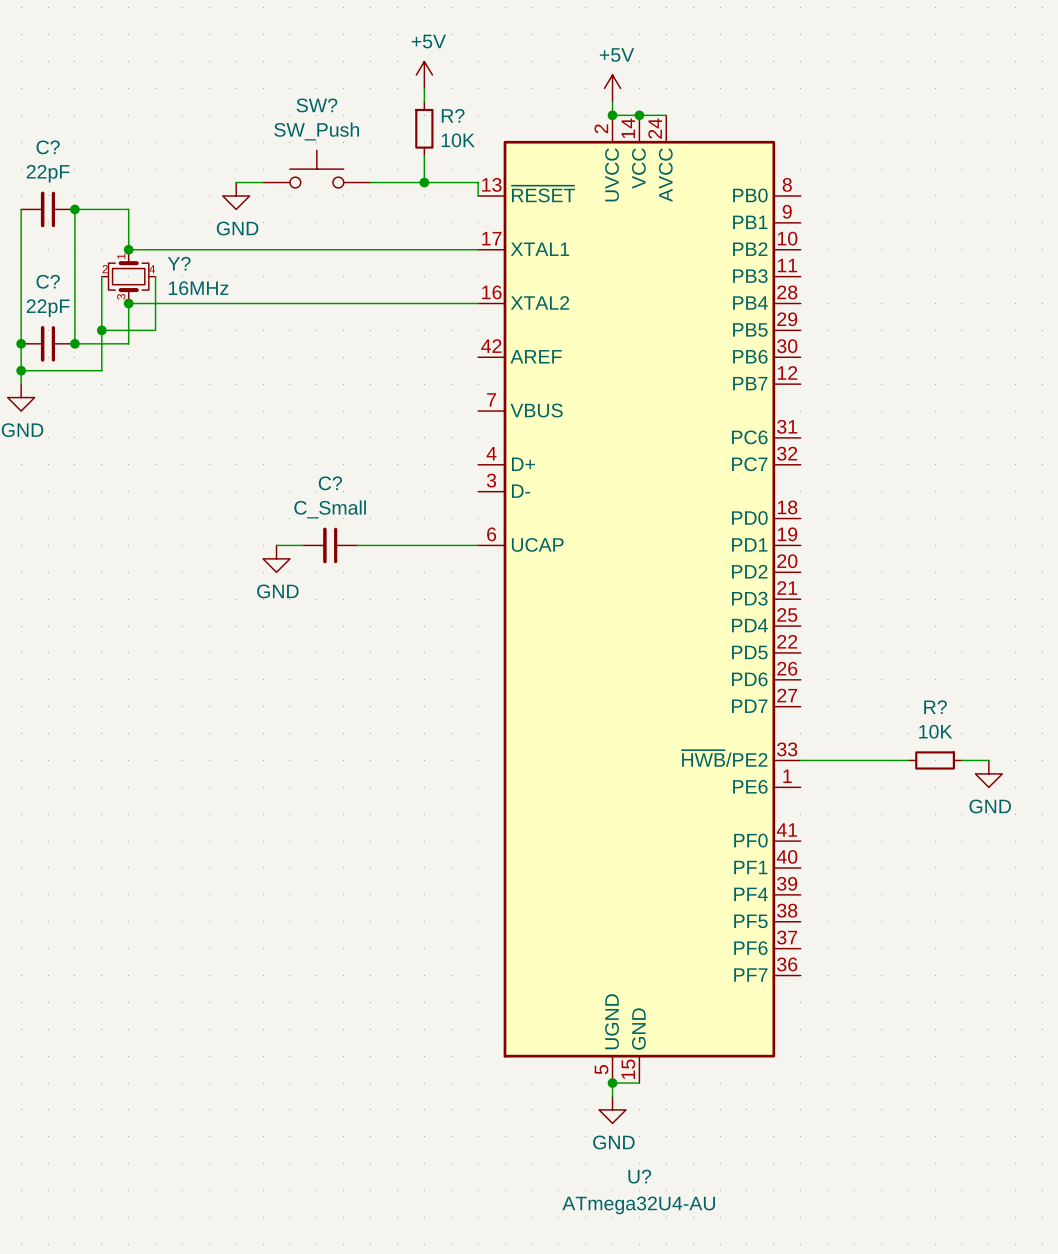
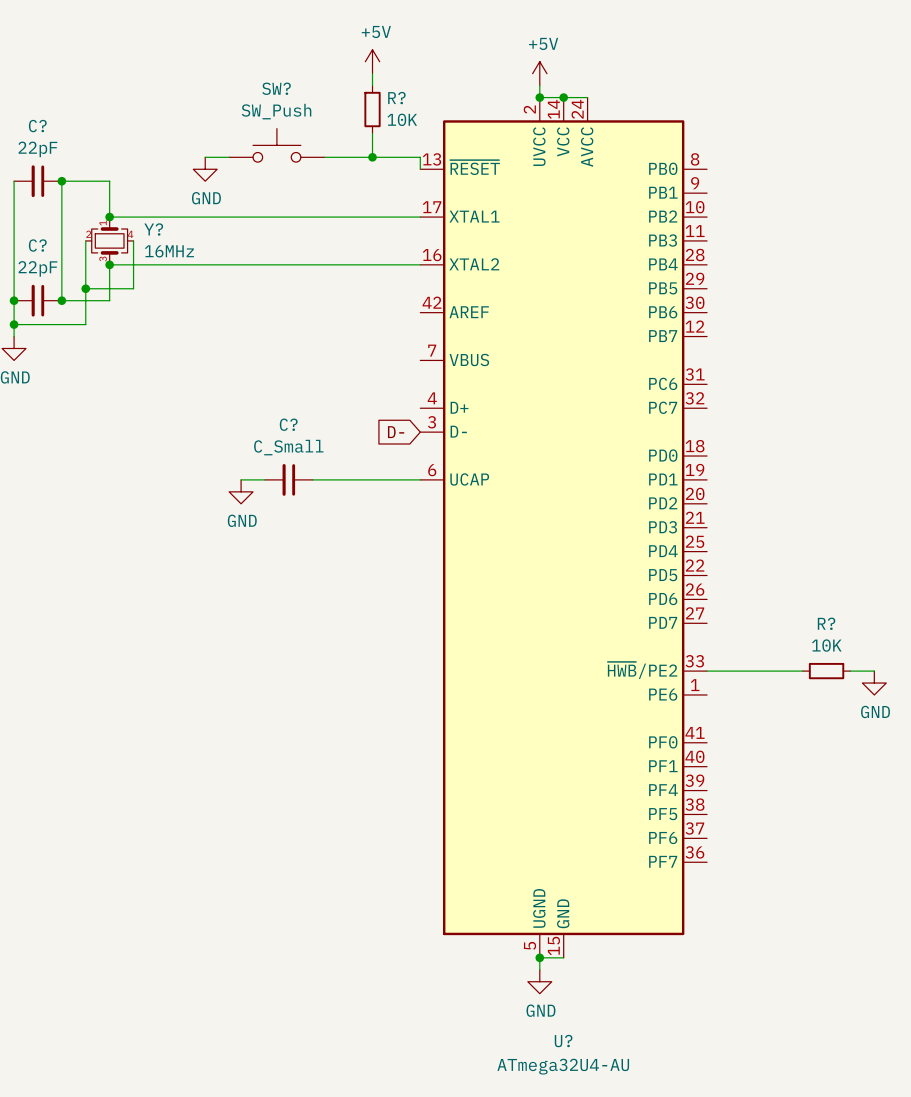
global label: none -> D- (396, 432)

